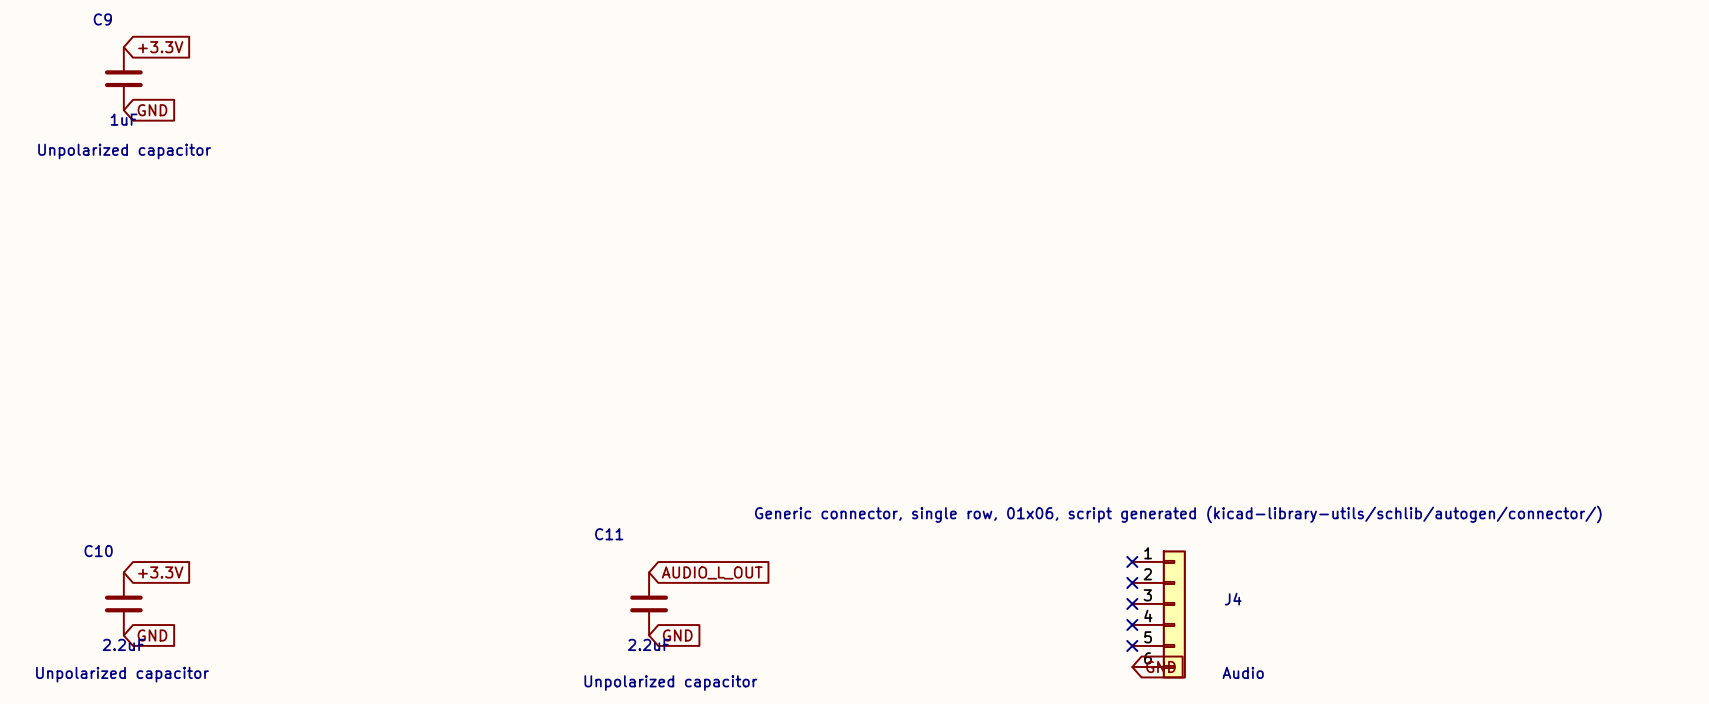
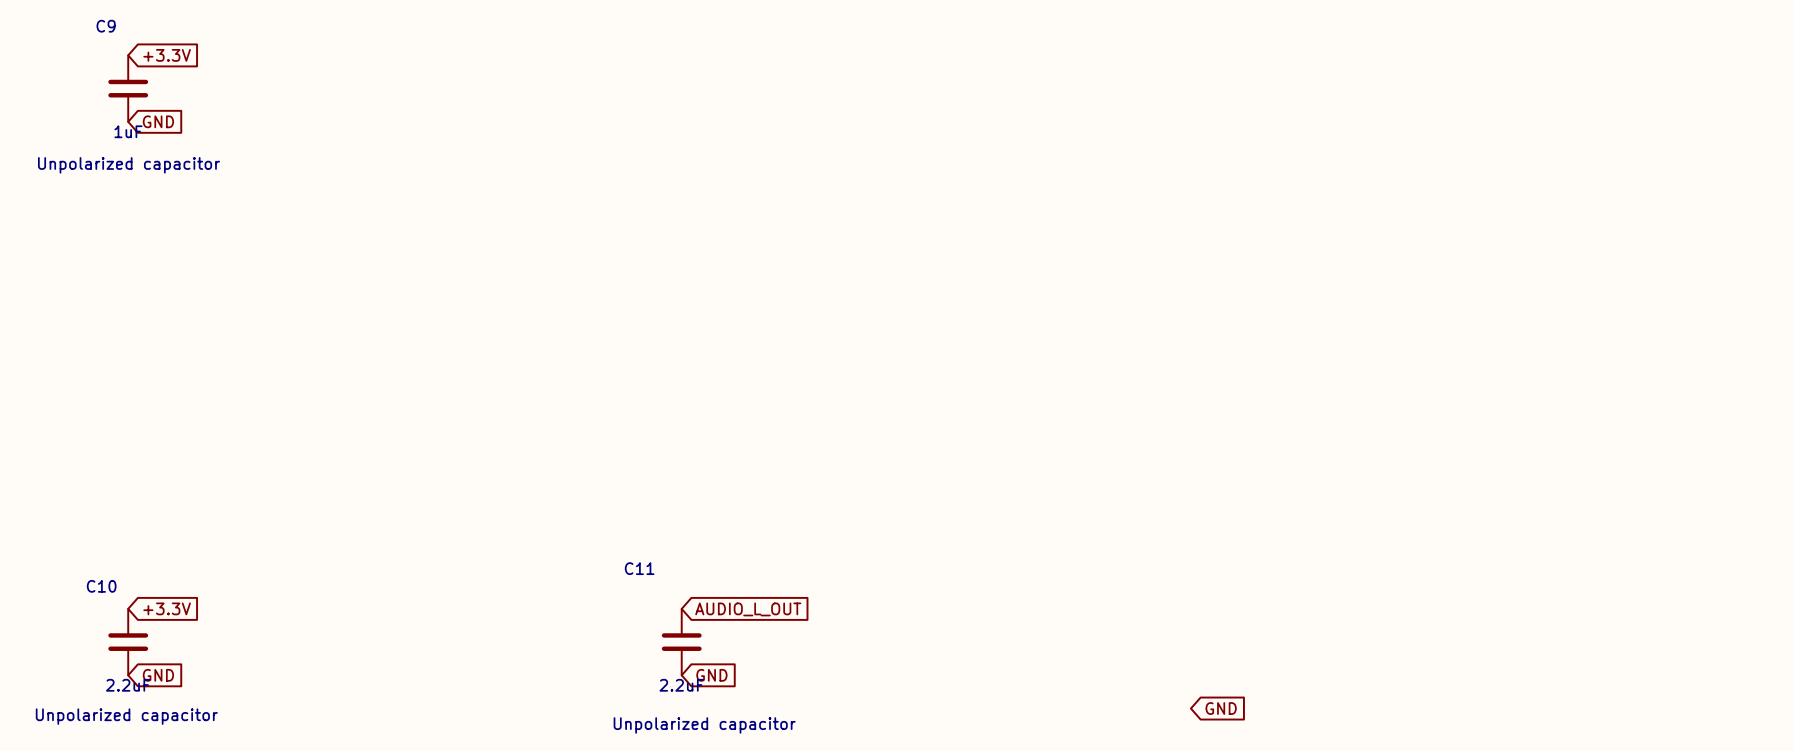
no-connect mark: (1132, 561) -> none
no-connect mark: (1132, 582) -> none
no-connect mark: (1132, 603) -> none
J4: Audio (1159, 614) -> none
no-connect mark: (1132, 624) -> none
no-connect mark: (1132, 645) -> none

